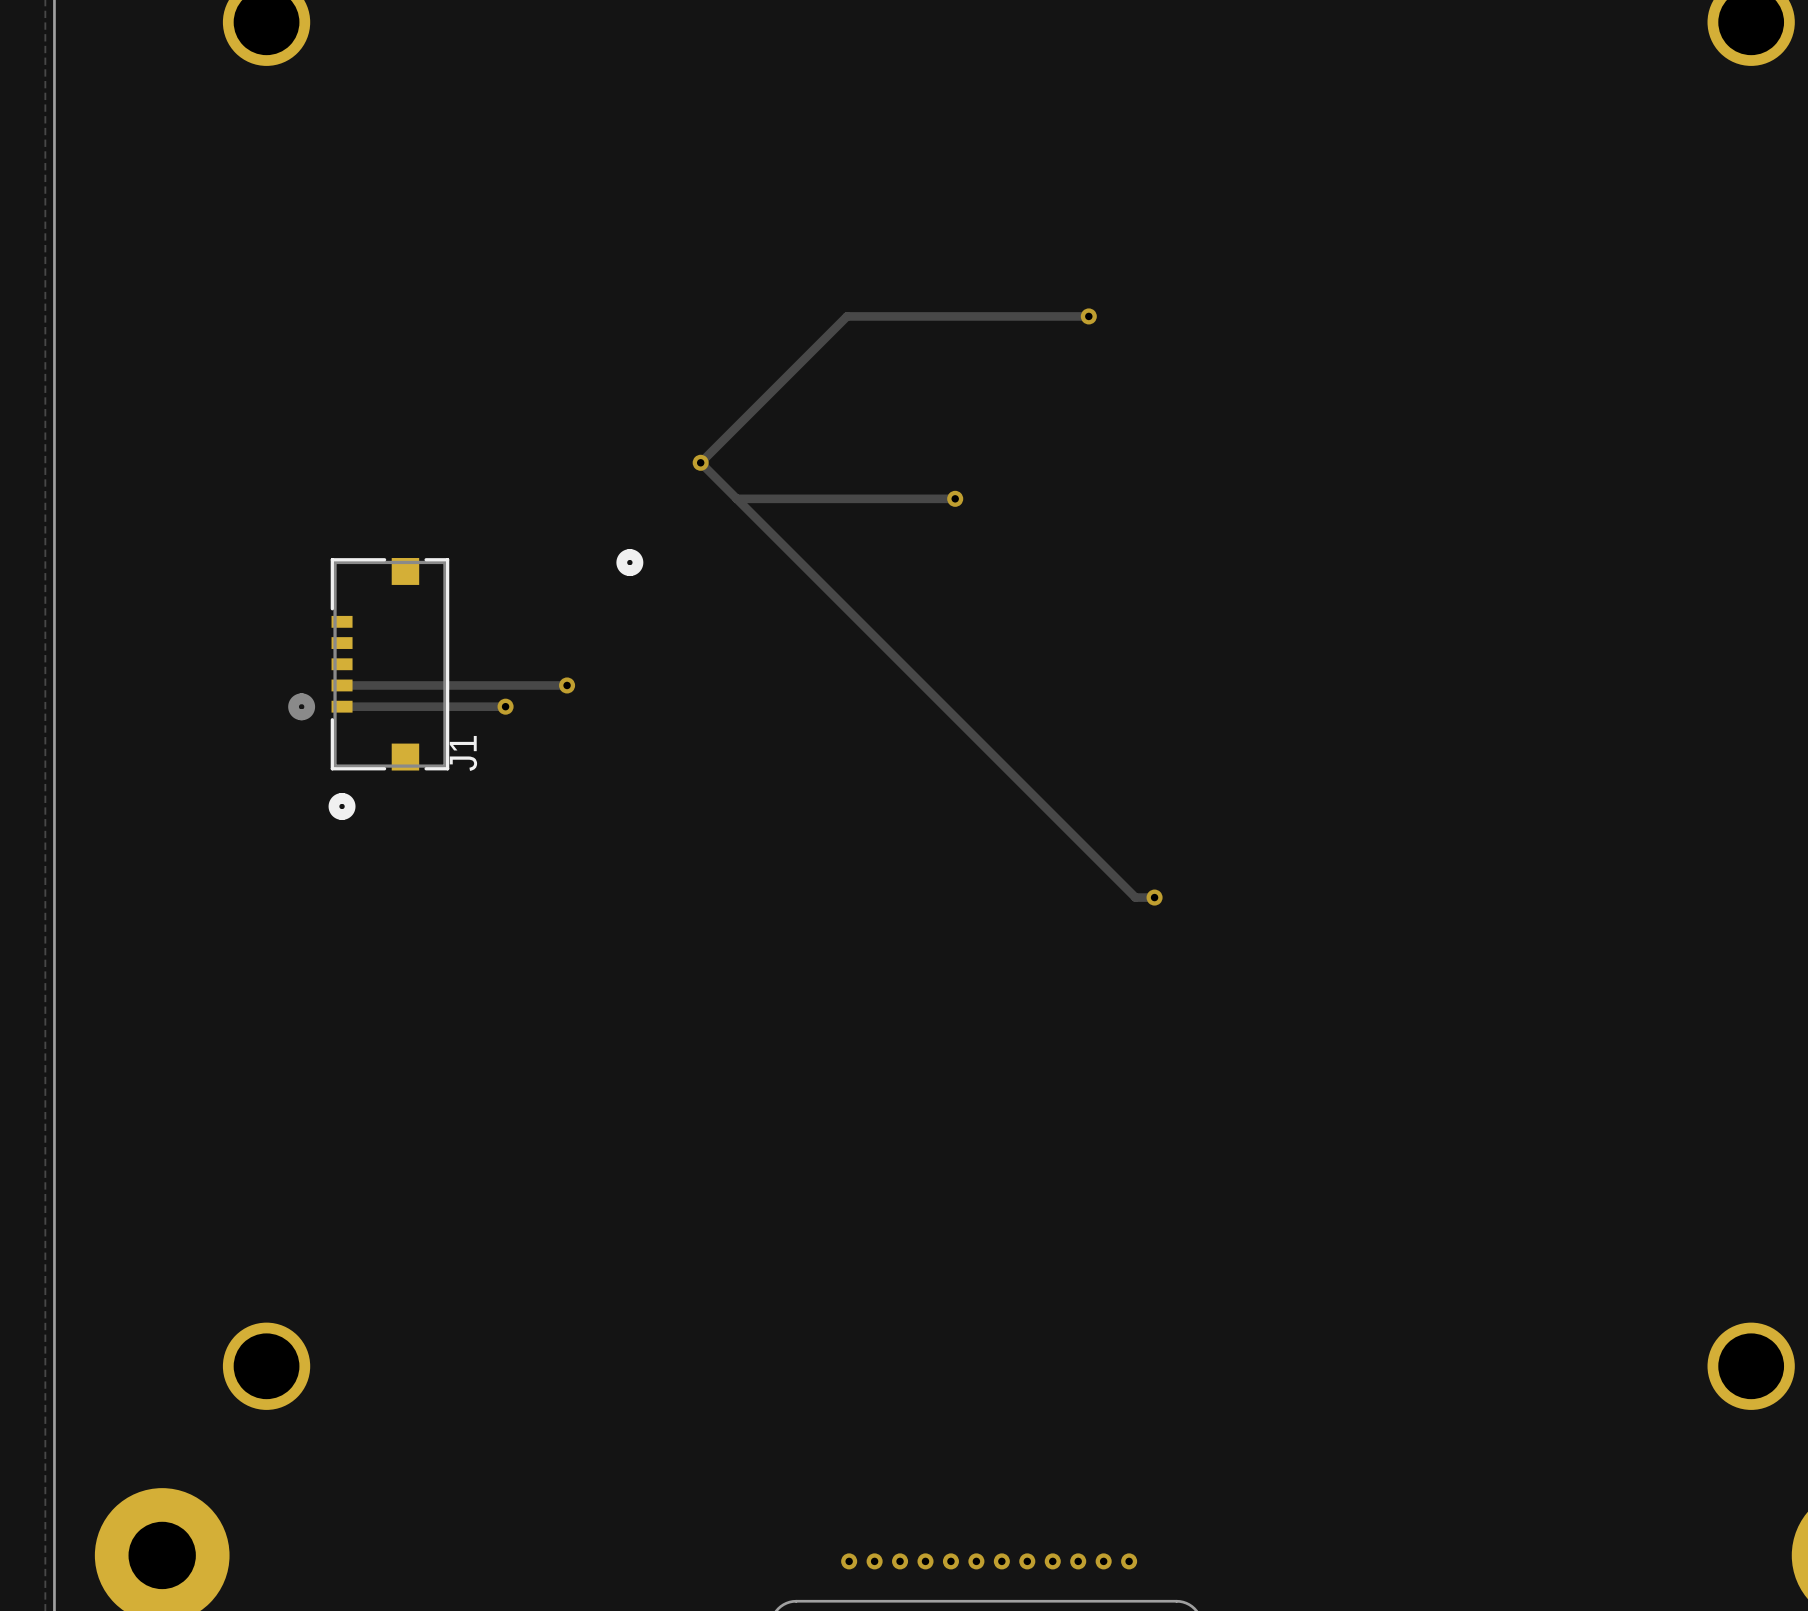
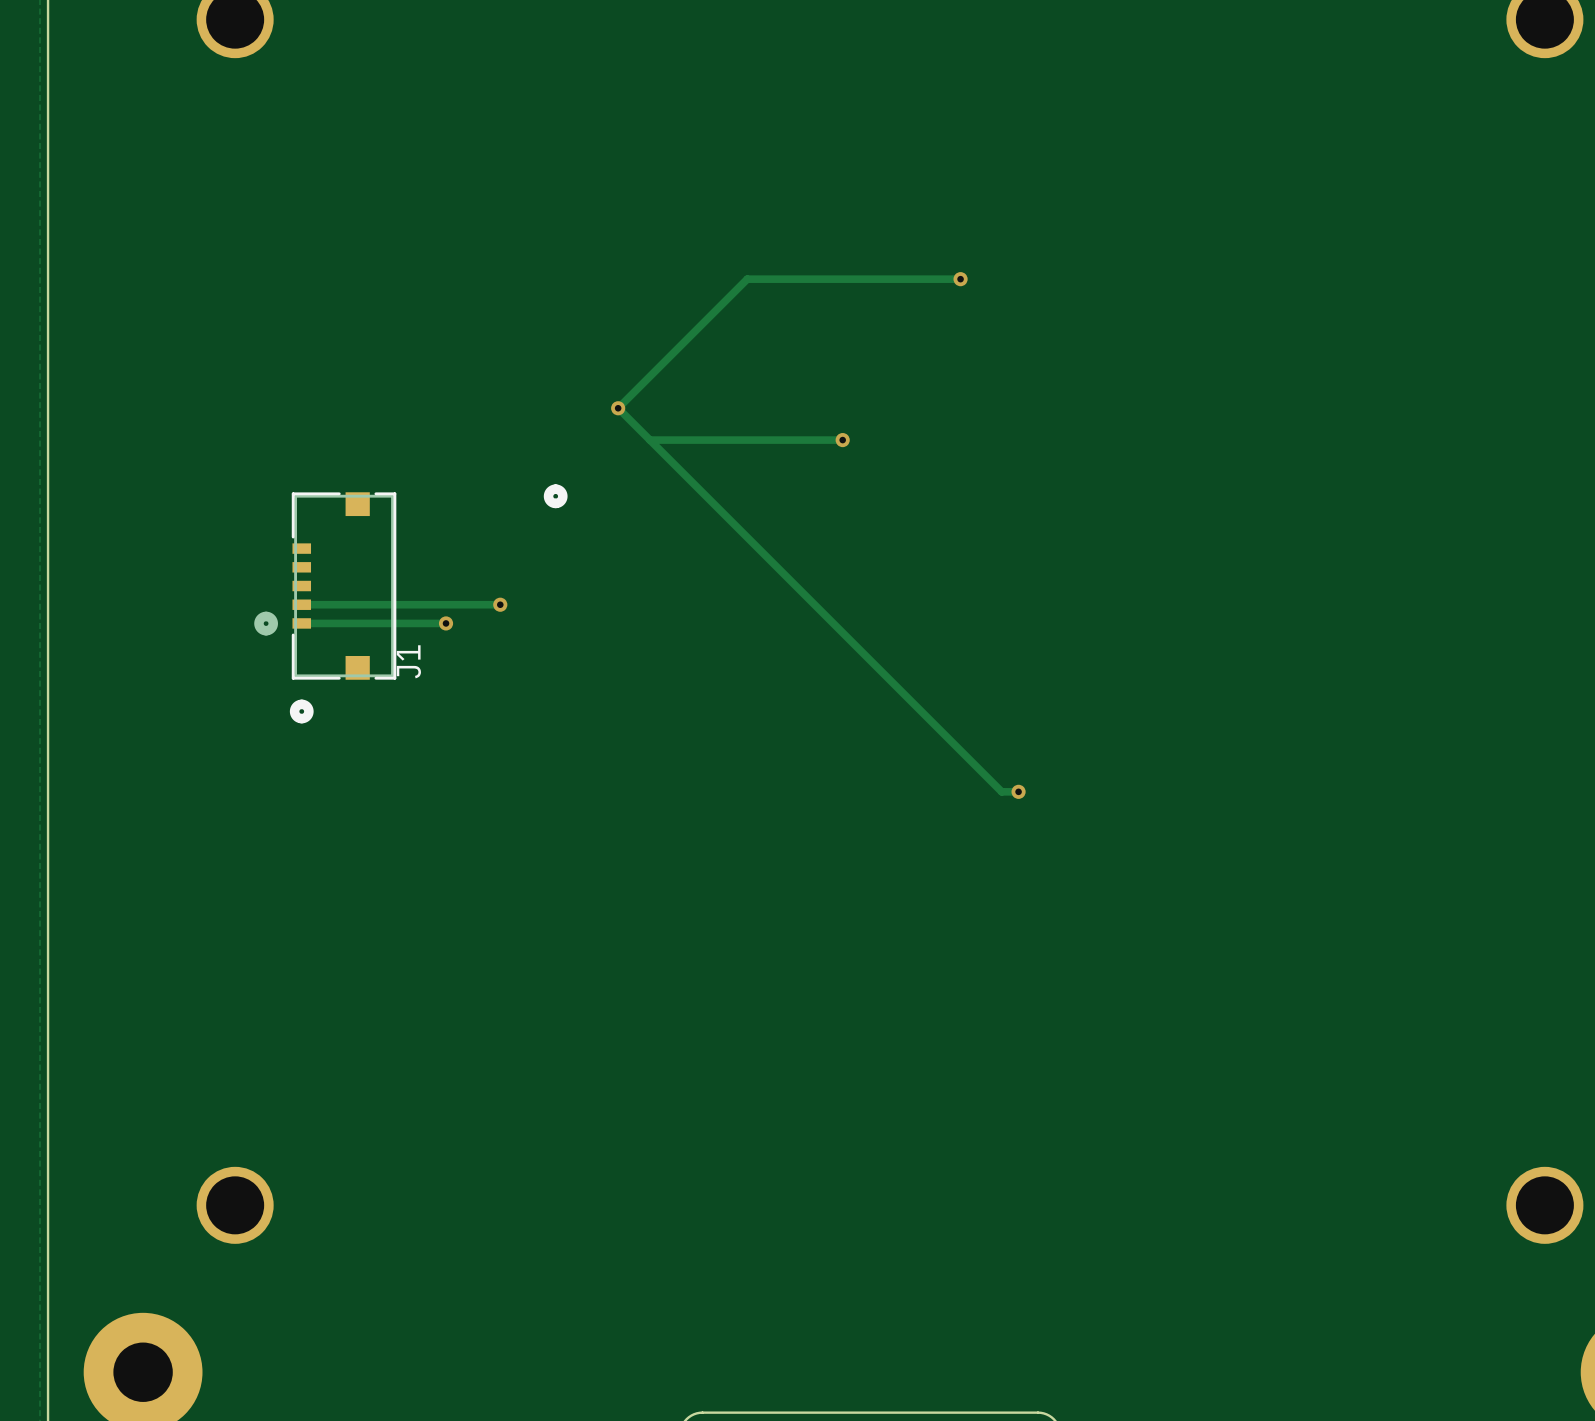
via: (849, 1561) -> none
via: (874, 1561) -> none
via: (900, 1561) -> none
via: (925, 1561) -> none
via: (950, 1561) -> none
via: (976, 1561) -> none
via: (1001, 1561) -> none
via: (1027, 1561) -> none
via: (1052, 1561) -> none
via: (1078, 1561) -> none
via: (1103, 1561) -> none
via: (1129, 1561) -> none

